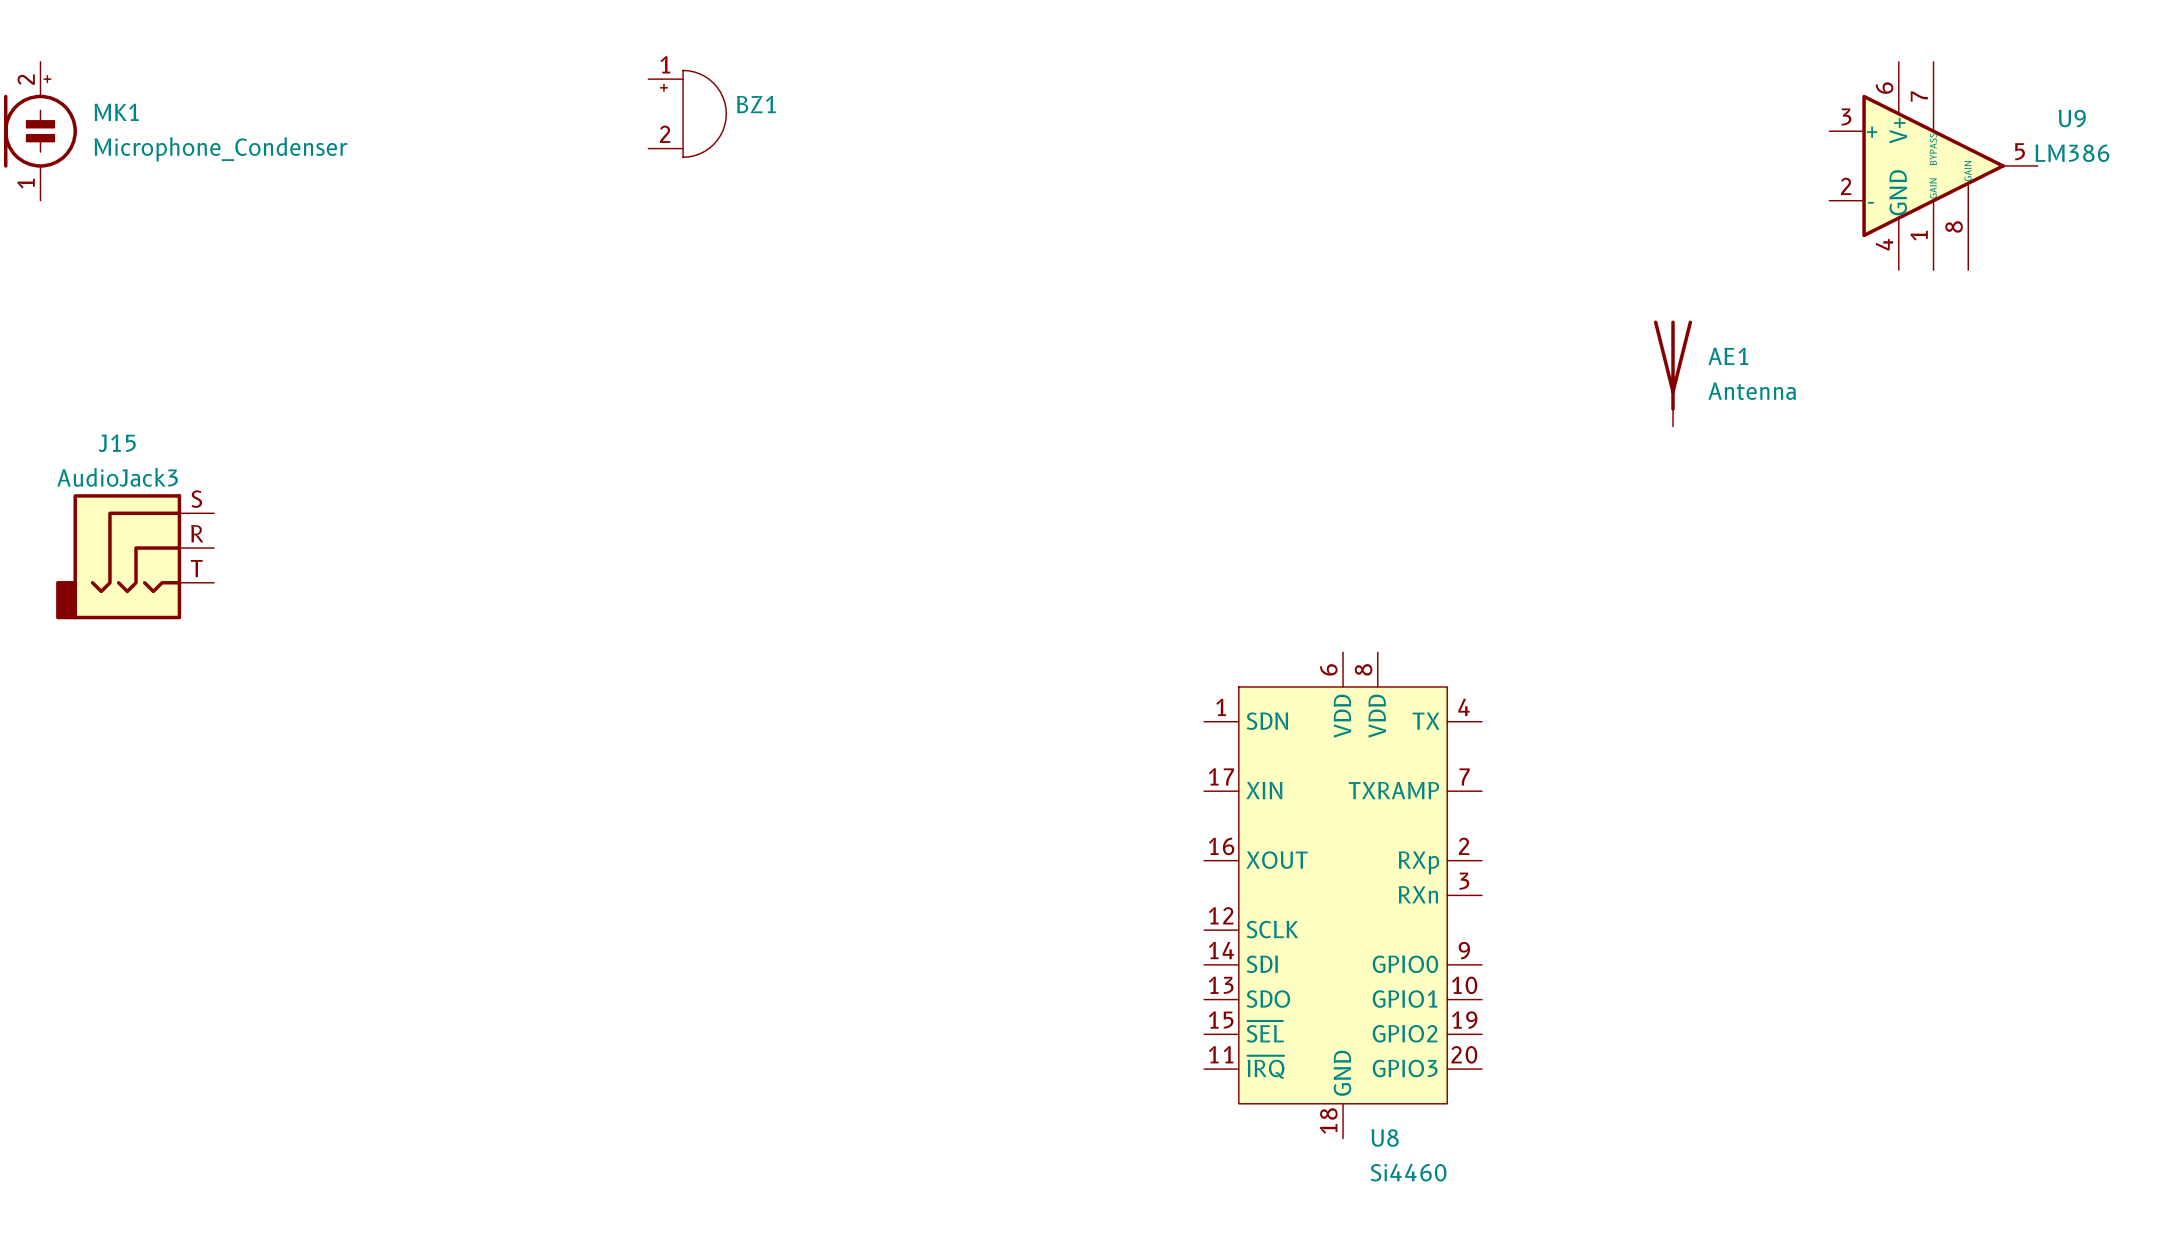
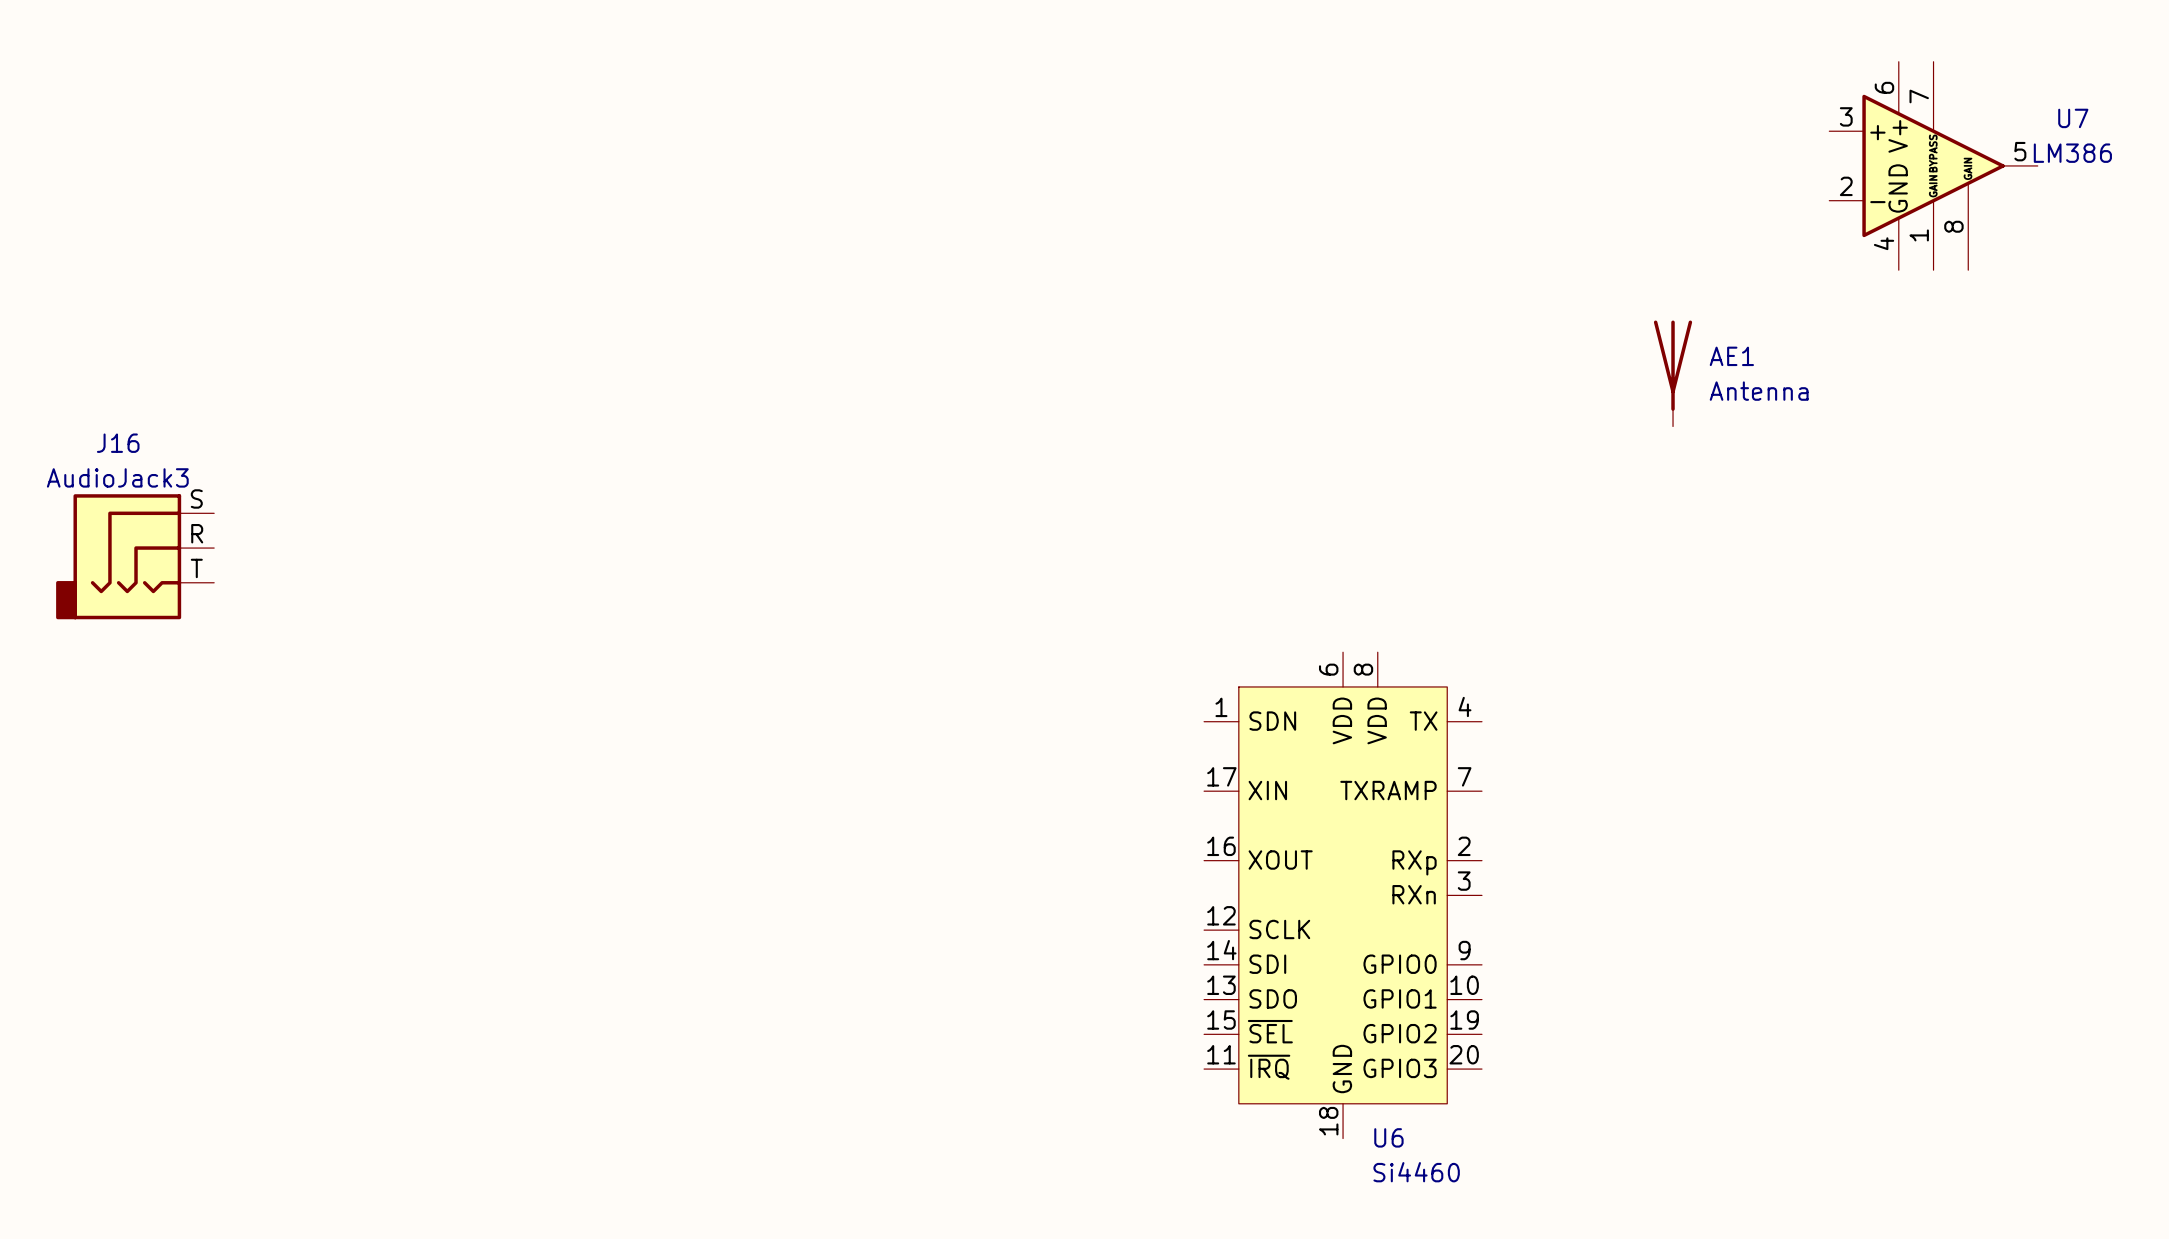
BZ1: (687, 113) -> none
U9 name: U9 (2072, 118) -> U7 (2073, 118)
MK1: Microphone_Condenser (40, 131) -> none
J15 name: J15 (117, 443) -> J16 (118, 443)
U8 name: U8 (1385, 1137) -> U6 (1388, 1137)

